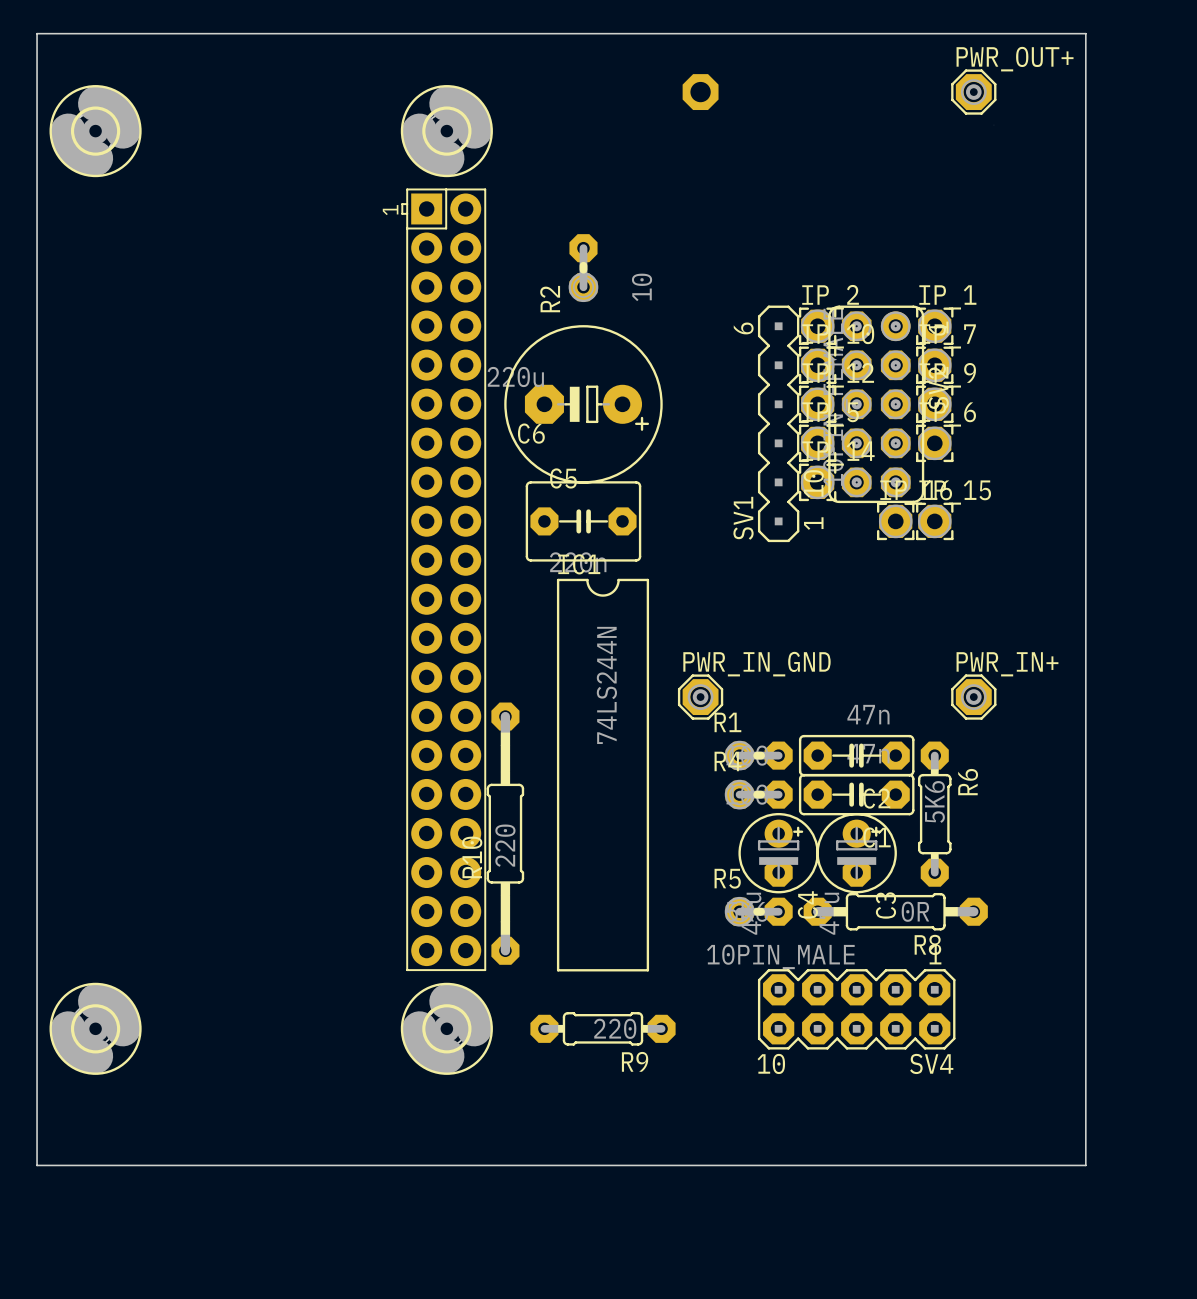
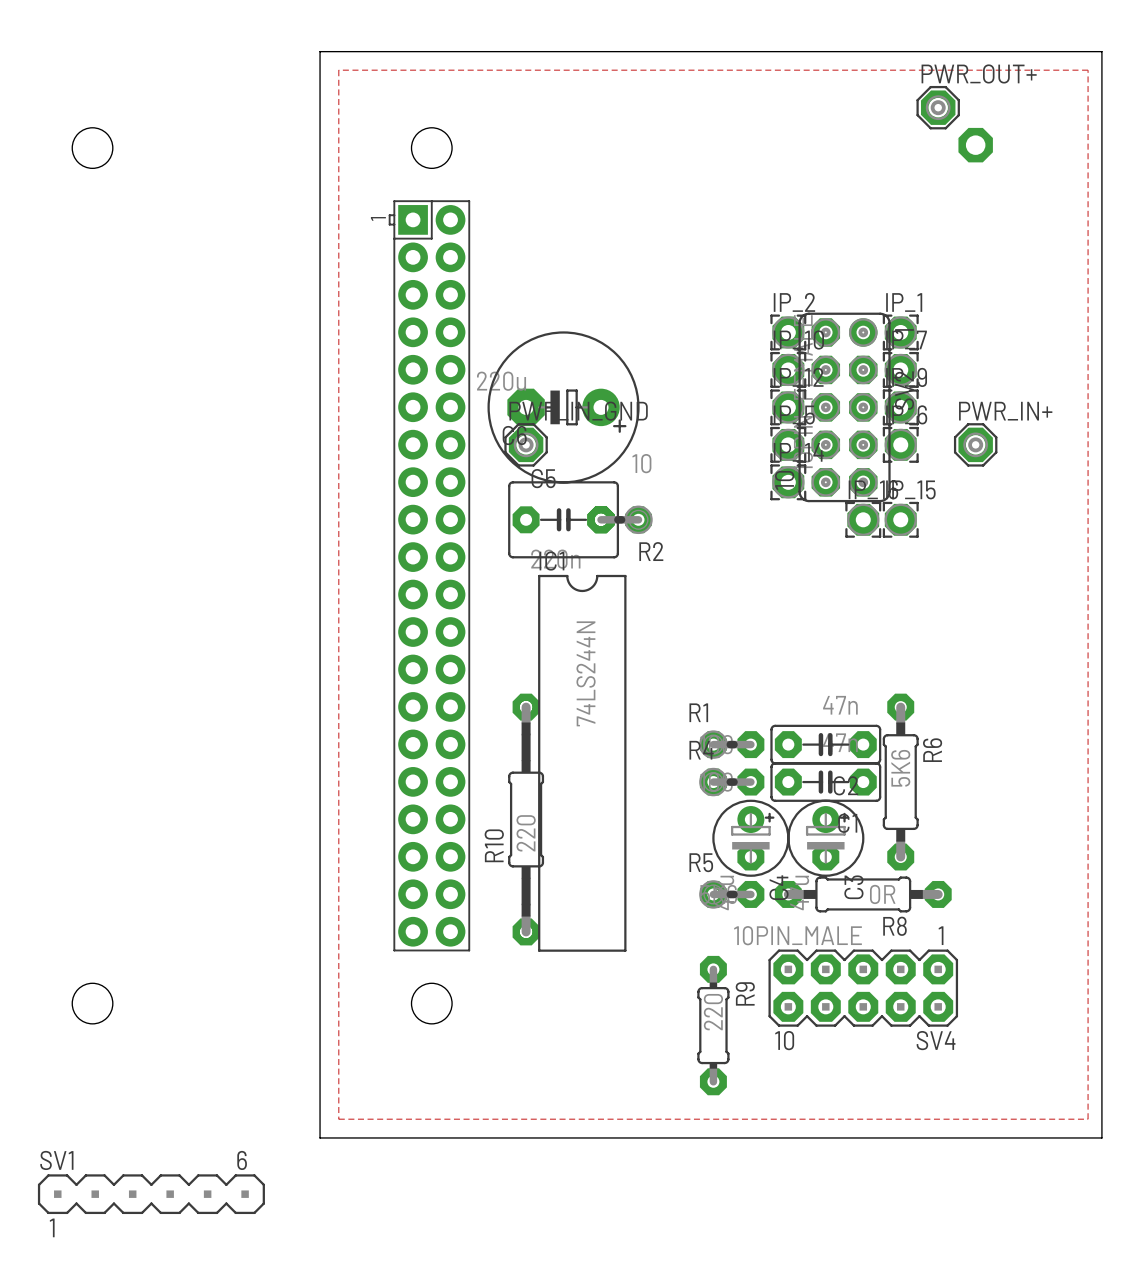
board edge: (329, 33) (37, 33) (37, 1165) (329, 1165) -> (320, 51) (320, 1137)
board edge: (1085, 33) (1085, 1165) -> (1045, 51) (1101, 51) (1101, 1137) (1045, 1137)
zone outline: none -> (338, 70) (1088, 70) (1088, 1119) (338, 1119) (338, 70)
part position: (700, 92) -> (975, 145)
part: (95, 131) -> none
part: (446, 131) -> none
R2 rotation: 0° (583, 268) -> 90° counterclockwise (620, 519)
R2 position: (583, 268) -> (620, 519)
SV1 rotation: 0° (778, 423) -> 90° clockwise (151, 1194)
SV1 position: (778, 423) -> (151, 1194)
PWR_IN_GND position: (700, 697) -> (526, 444)
PWR_IN+ position: (973, 697) -> (975, 444)
R6 footprint: [917, 741, 952, 887] -> [882, 693, 919, 871]
R10 position: (505, 833) -> (526, 819)
SV4 position: (856, 1009) -> (863, 988)
part: (95, 1028) -> none
part: (446, 1028) -> none
R9 rotation: 0° (603, 1028) -> 90° clockwise (713, 1025)
R9 position: (603, 1028) -> (713, 1025)
R9 name position: R9 (635, 1061) -> R9 (745, 993)

